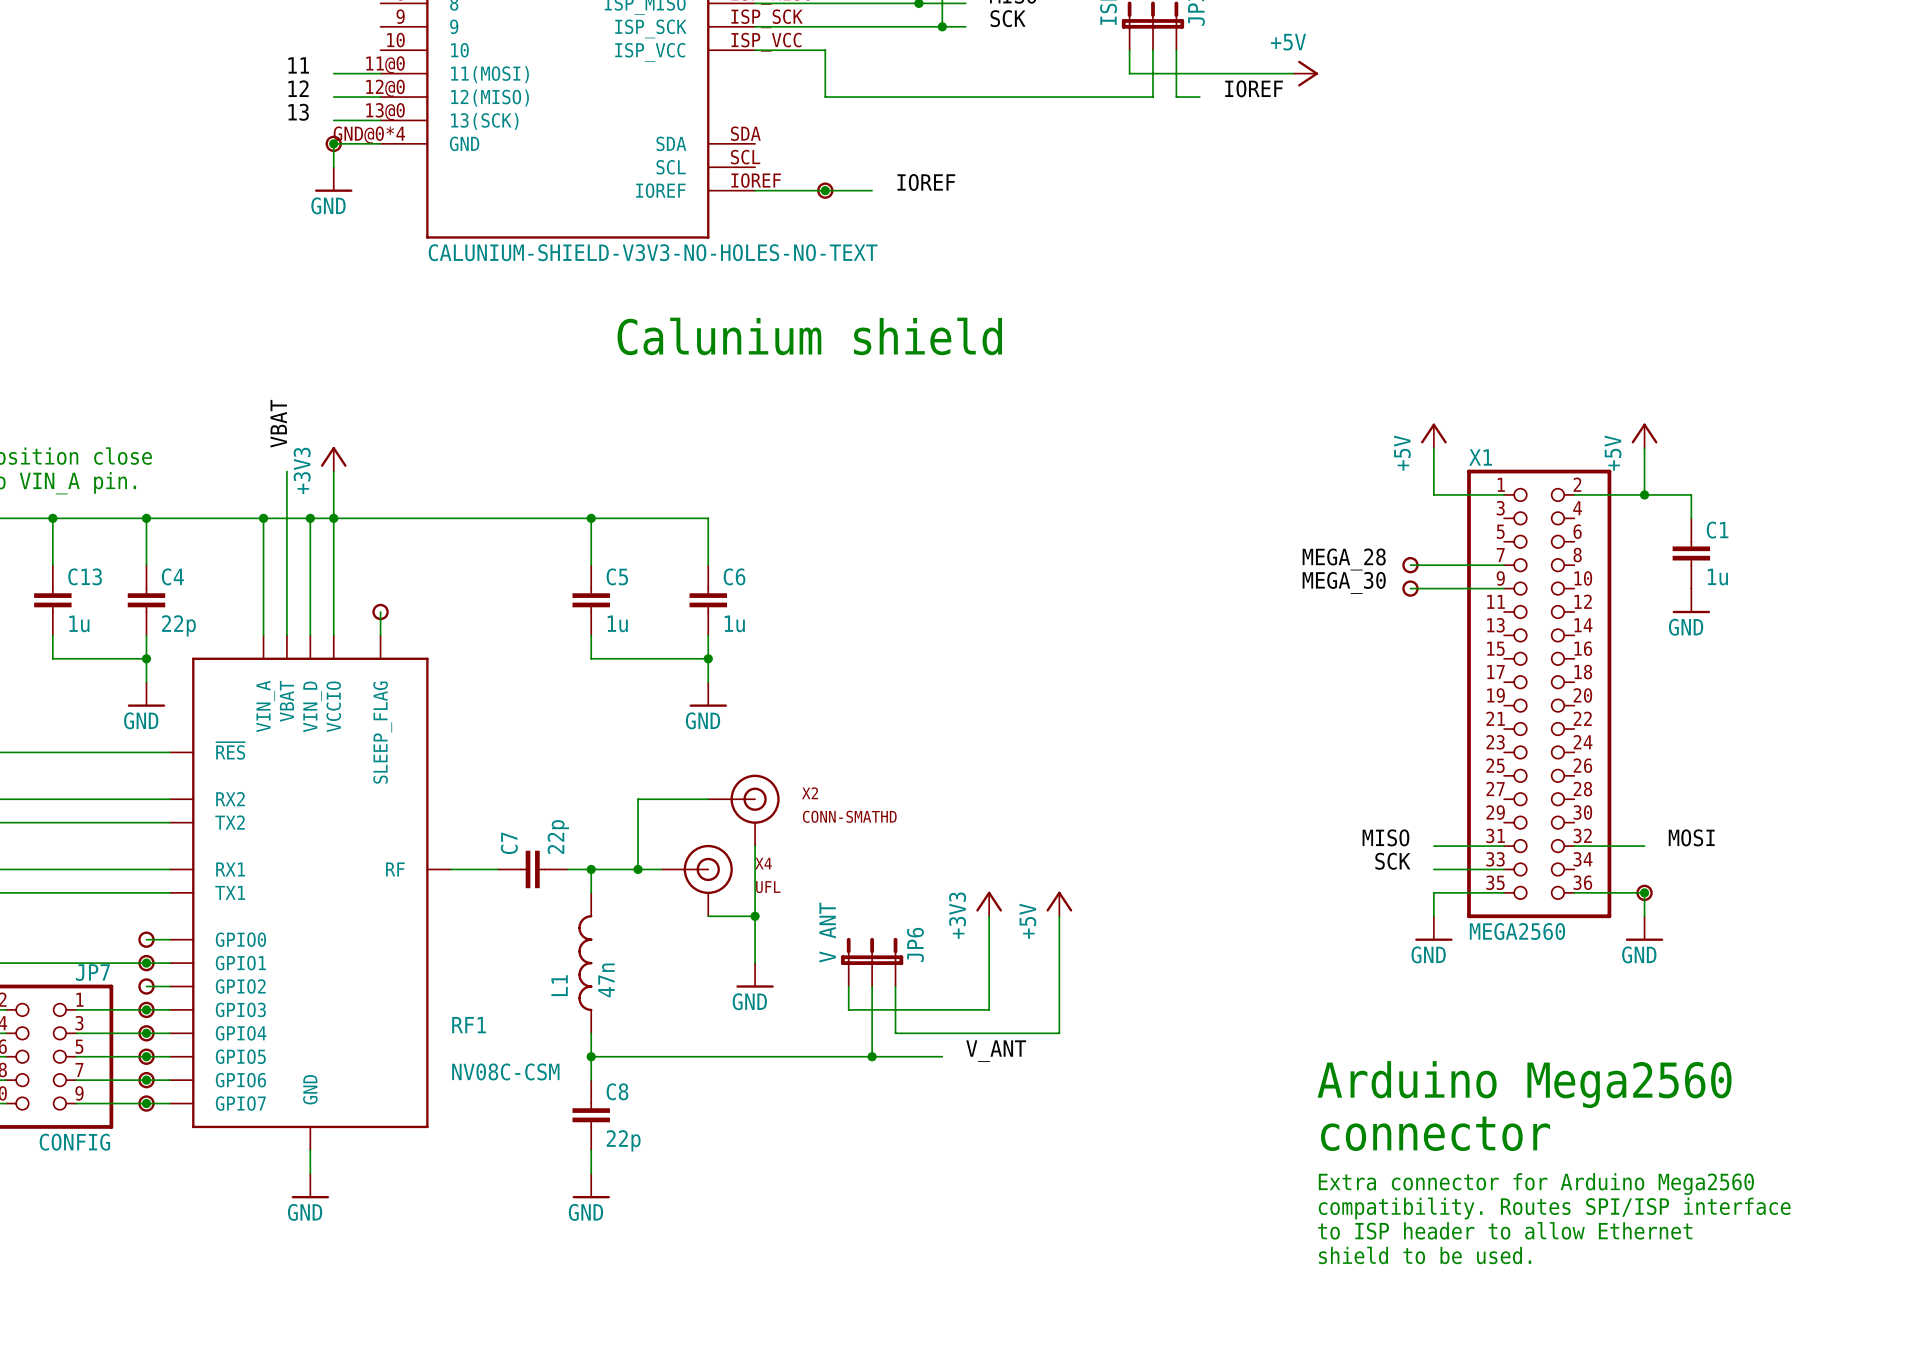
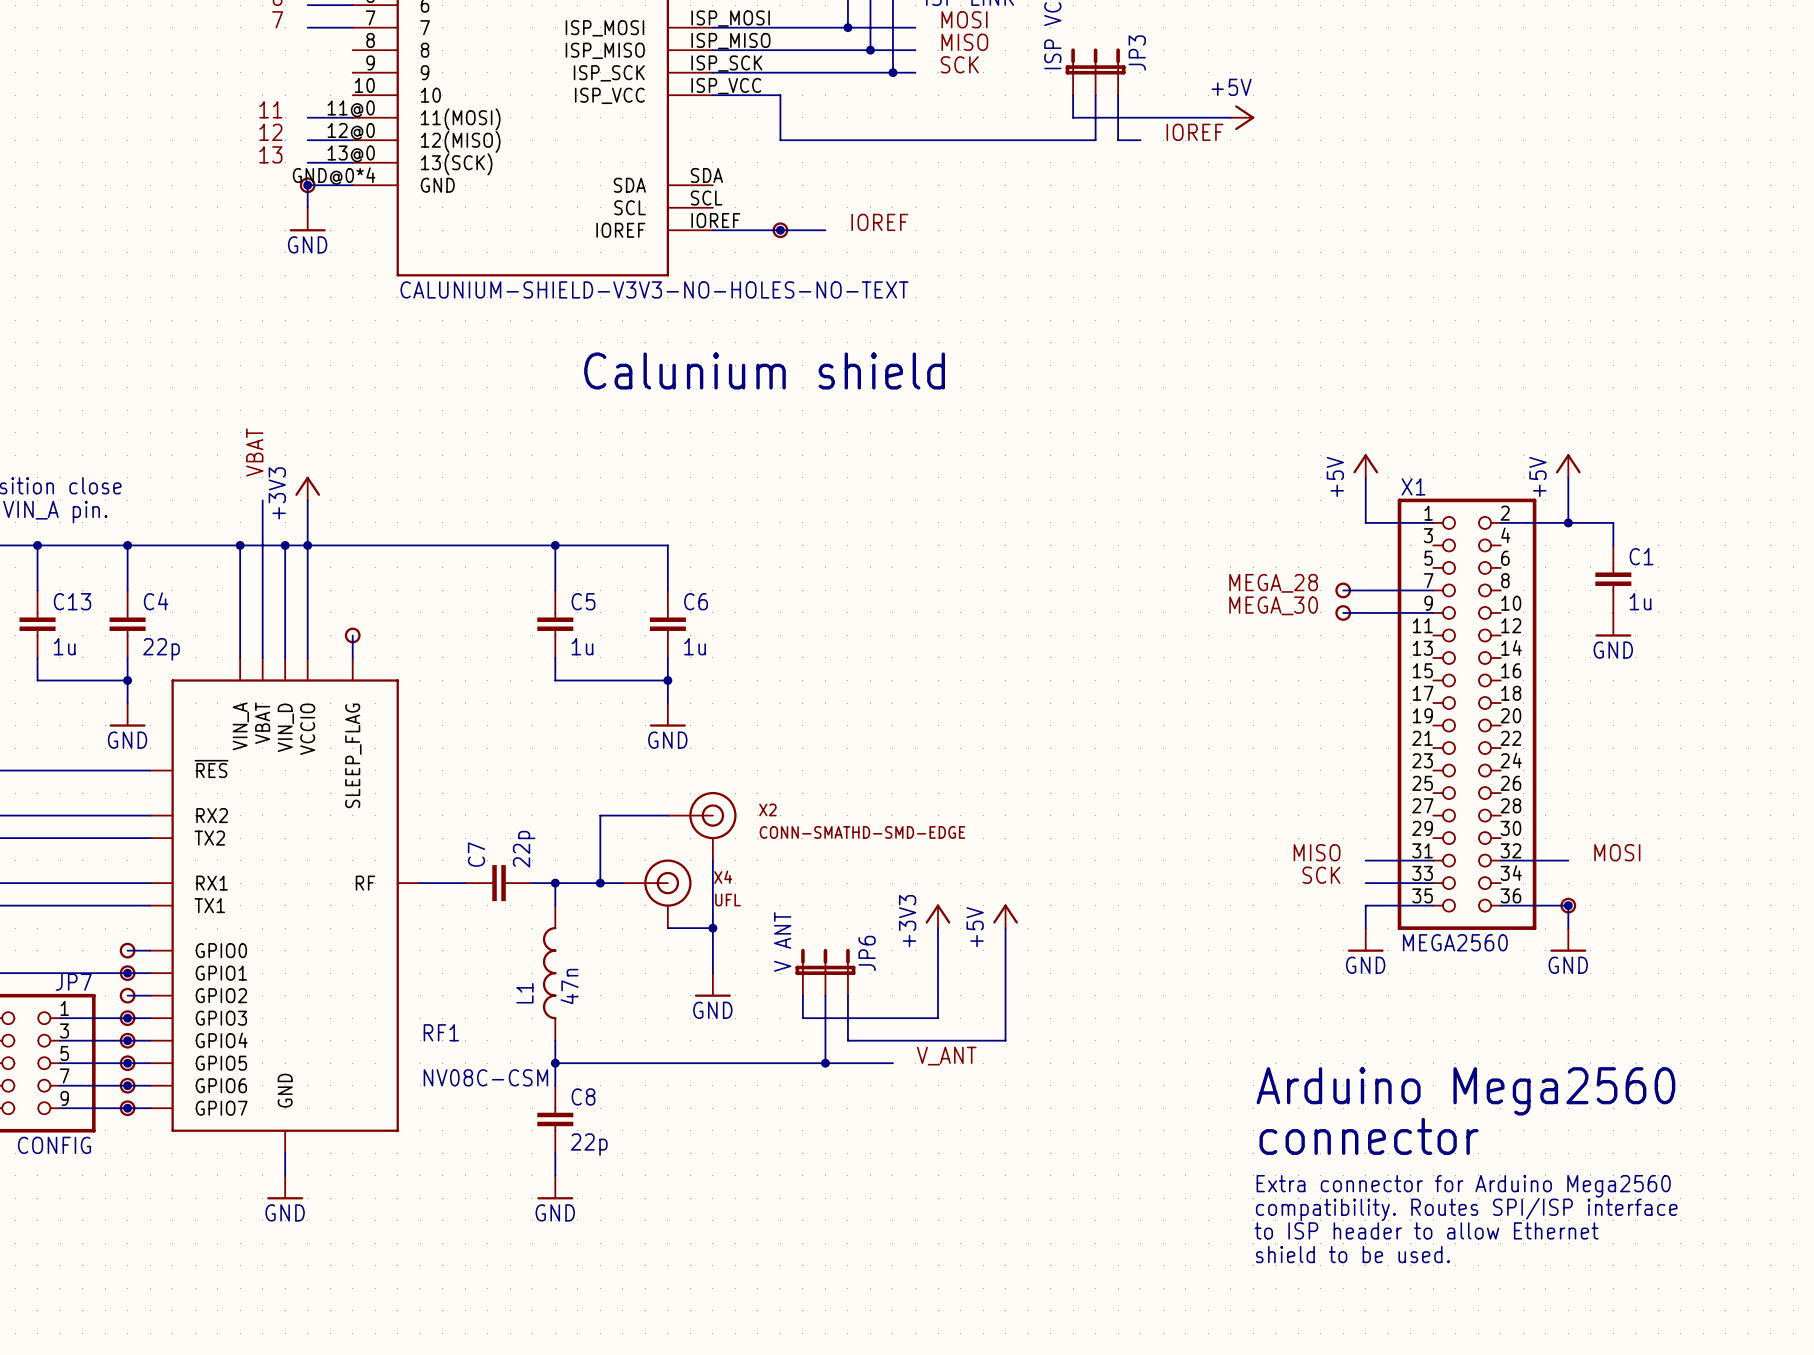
X2 value: CONN-SMATHD (849, 816) -> CONN-SMATHD-SMD-EDGE (862, 832)

